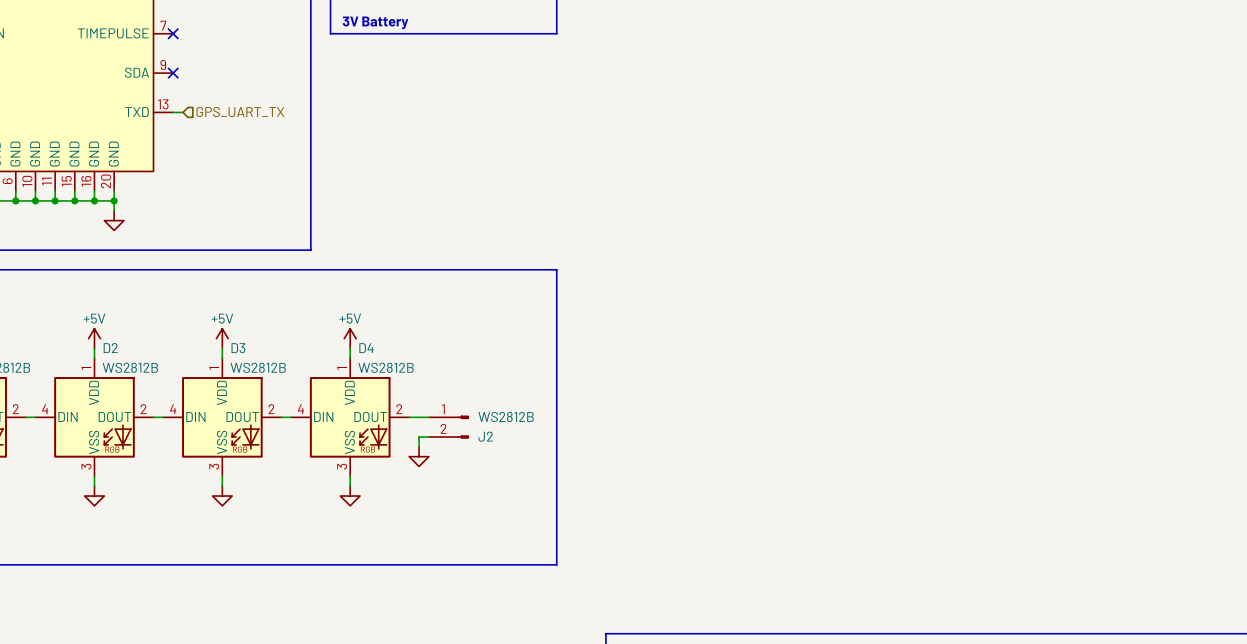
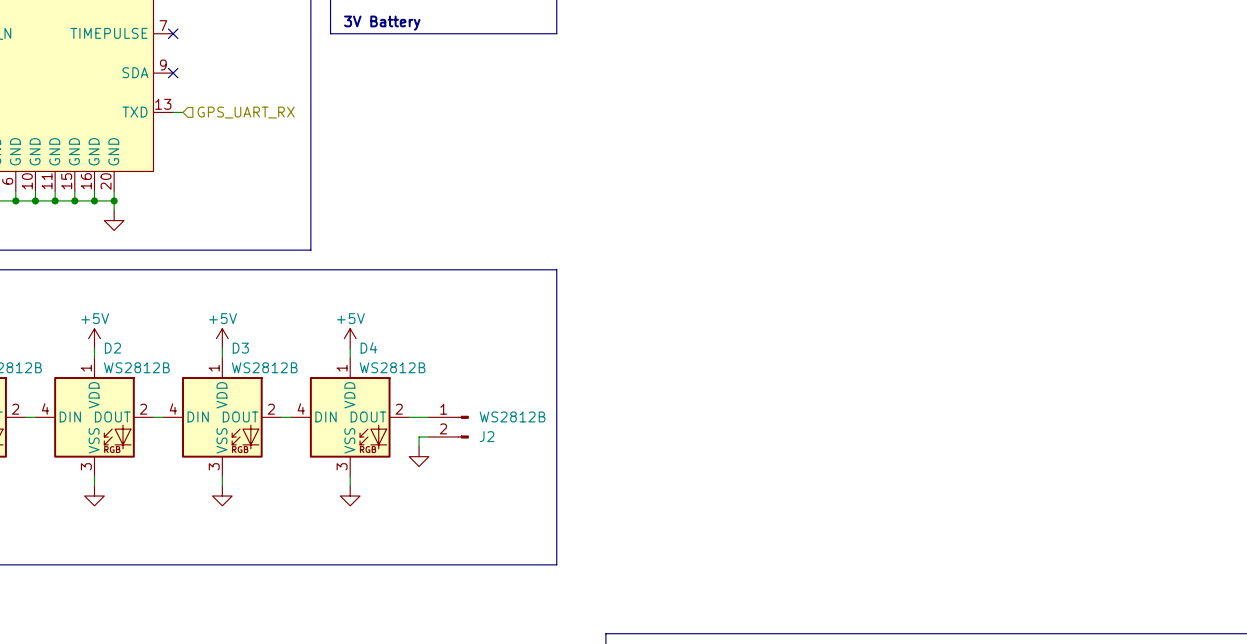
hierarchical label: GPS_UART_TX (240, 112) -> GPS_UART_RX (246, 112)

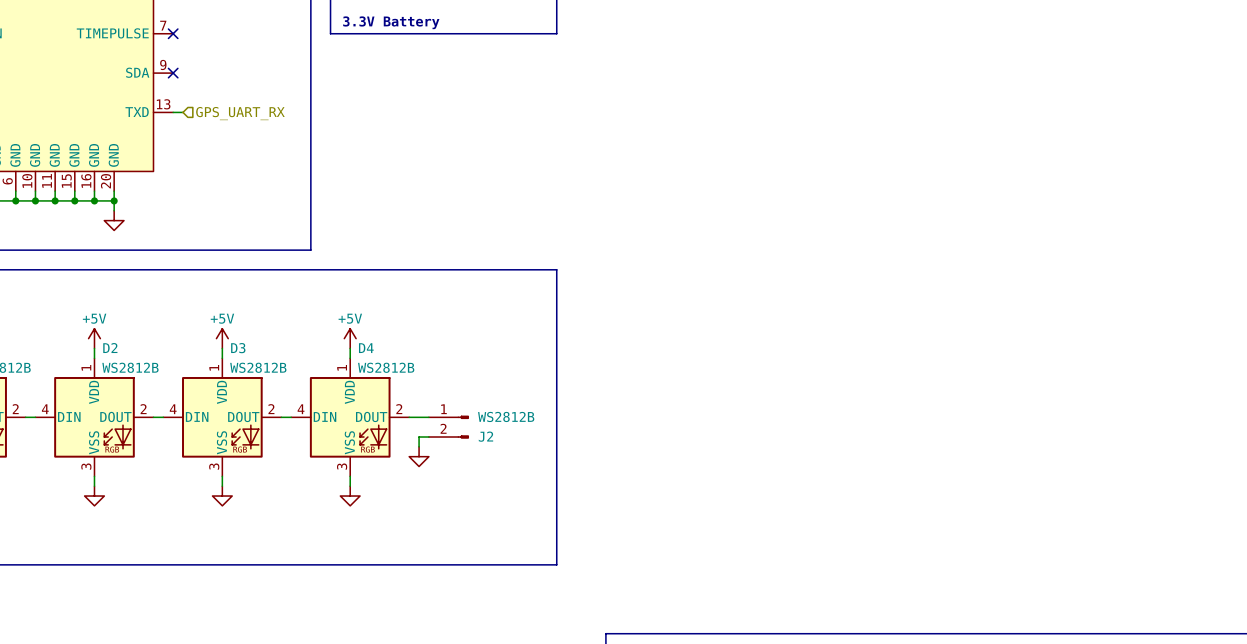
text: 3V Battery (382, 23) -> 3.3V Battery (391, 22)

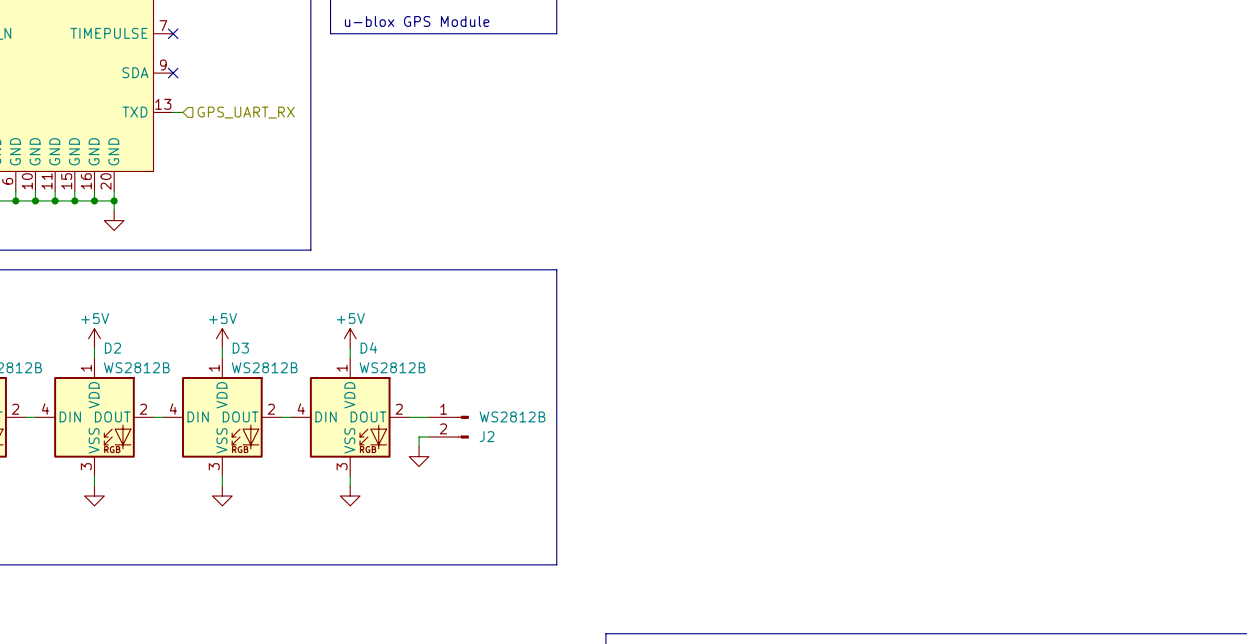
text: 3.3V Battery (391, 22) -> u-blox GPS Module (417, 21)

